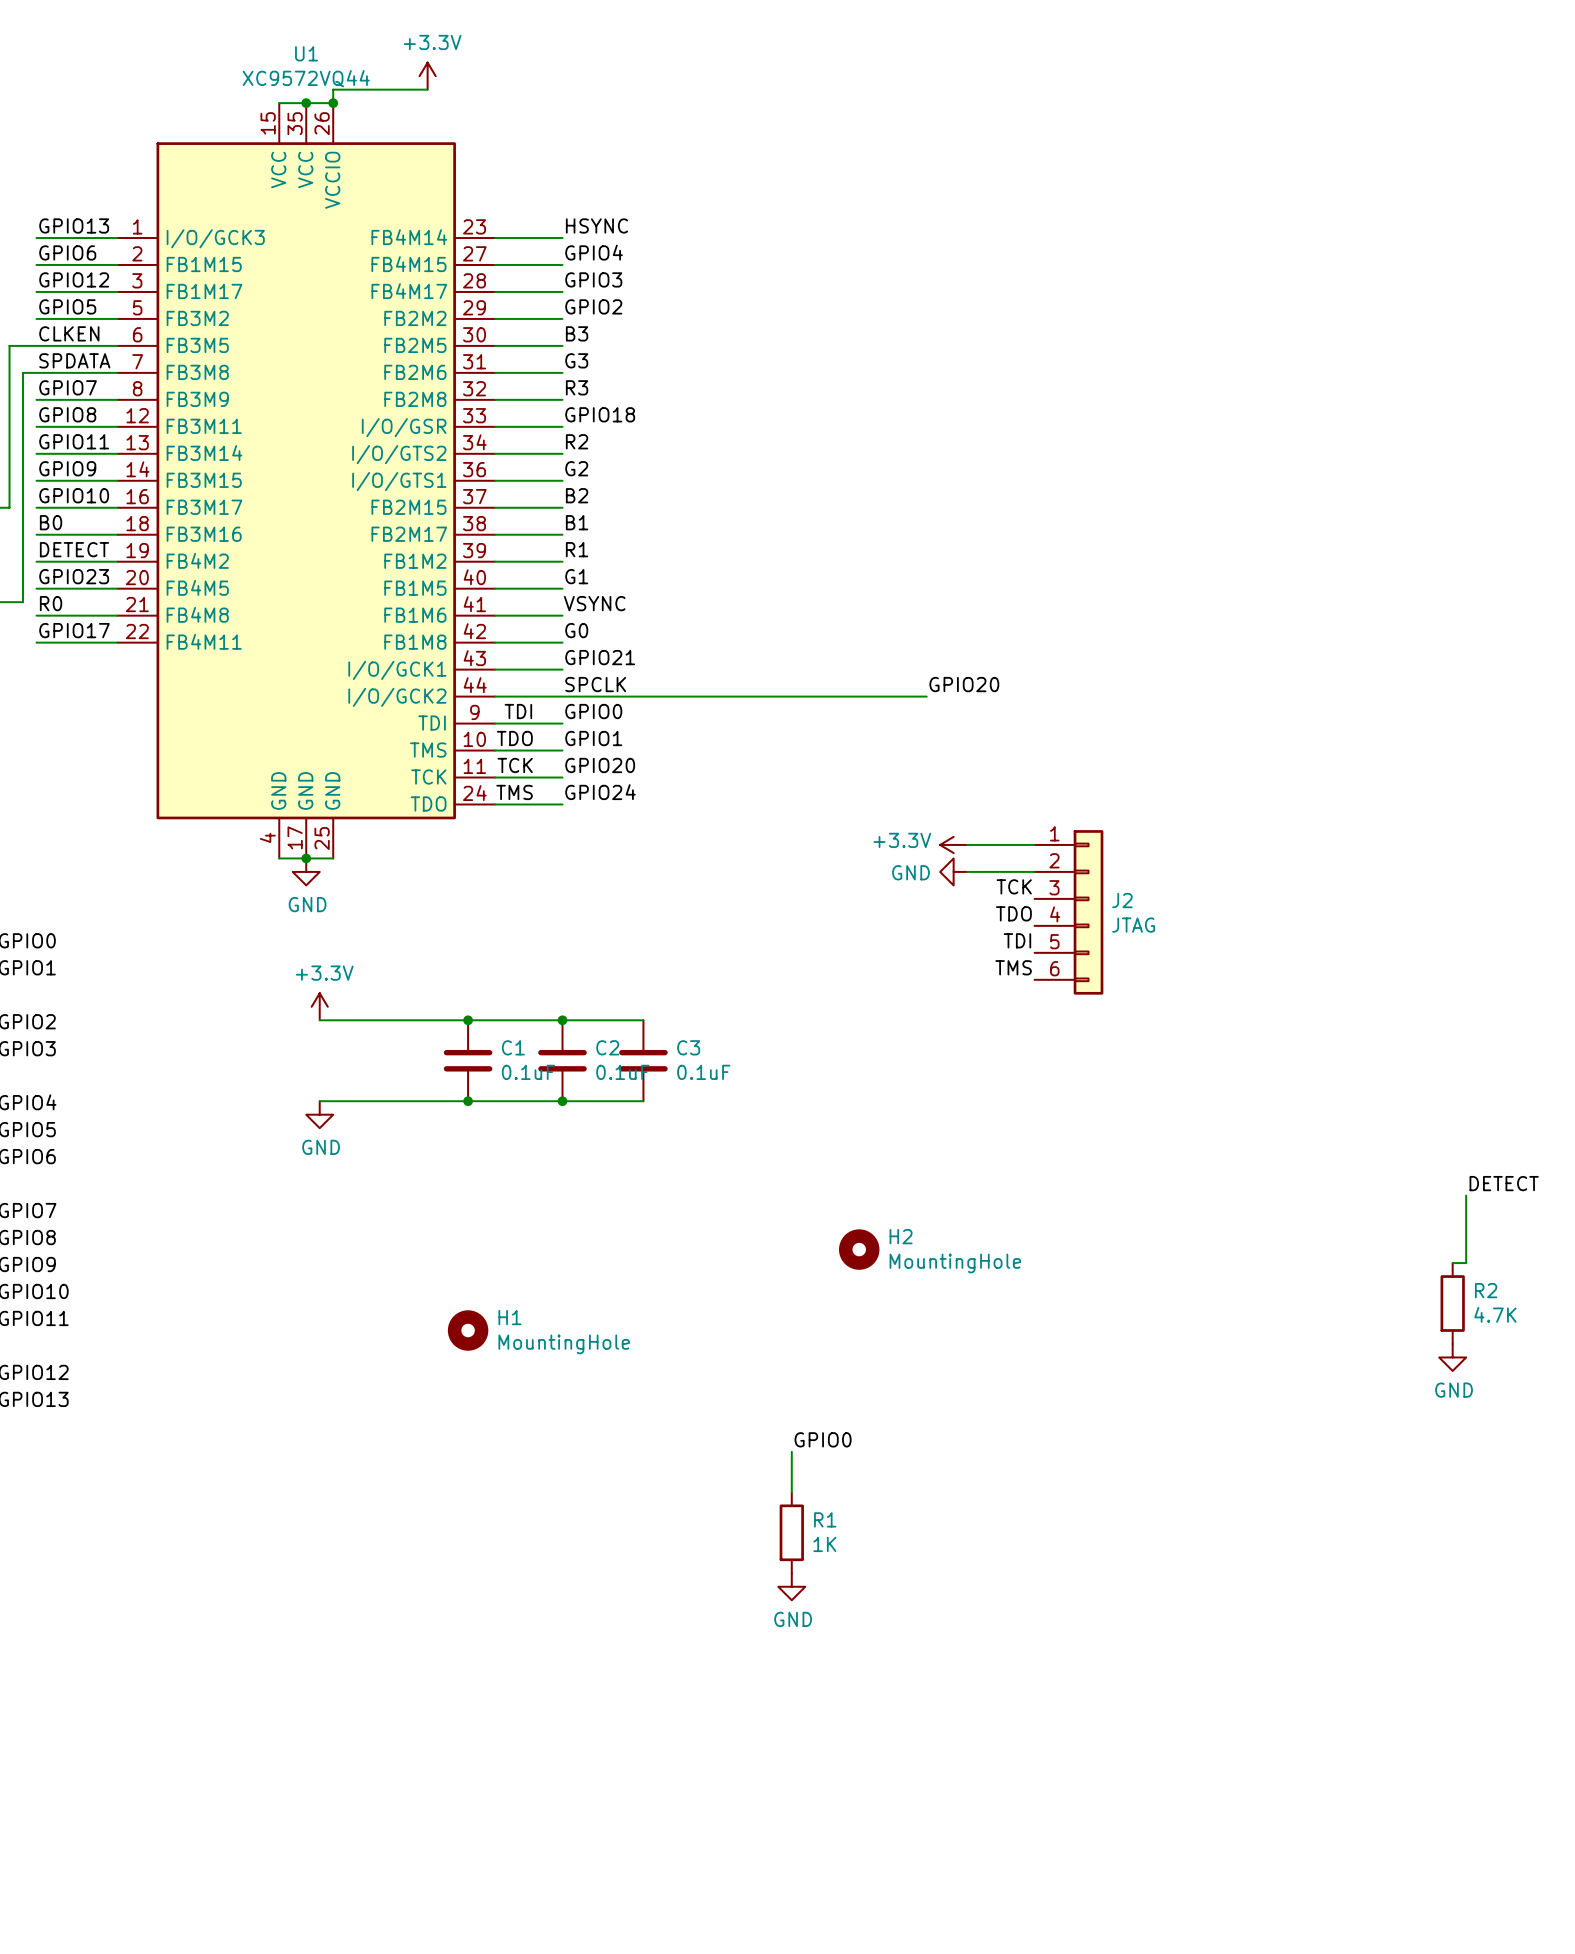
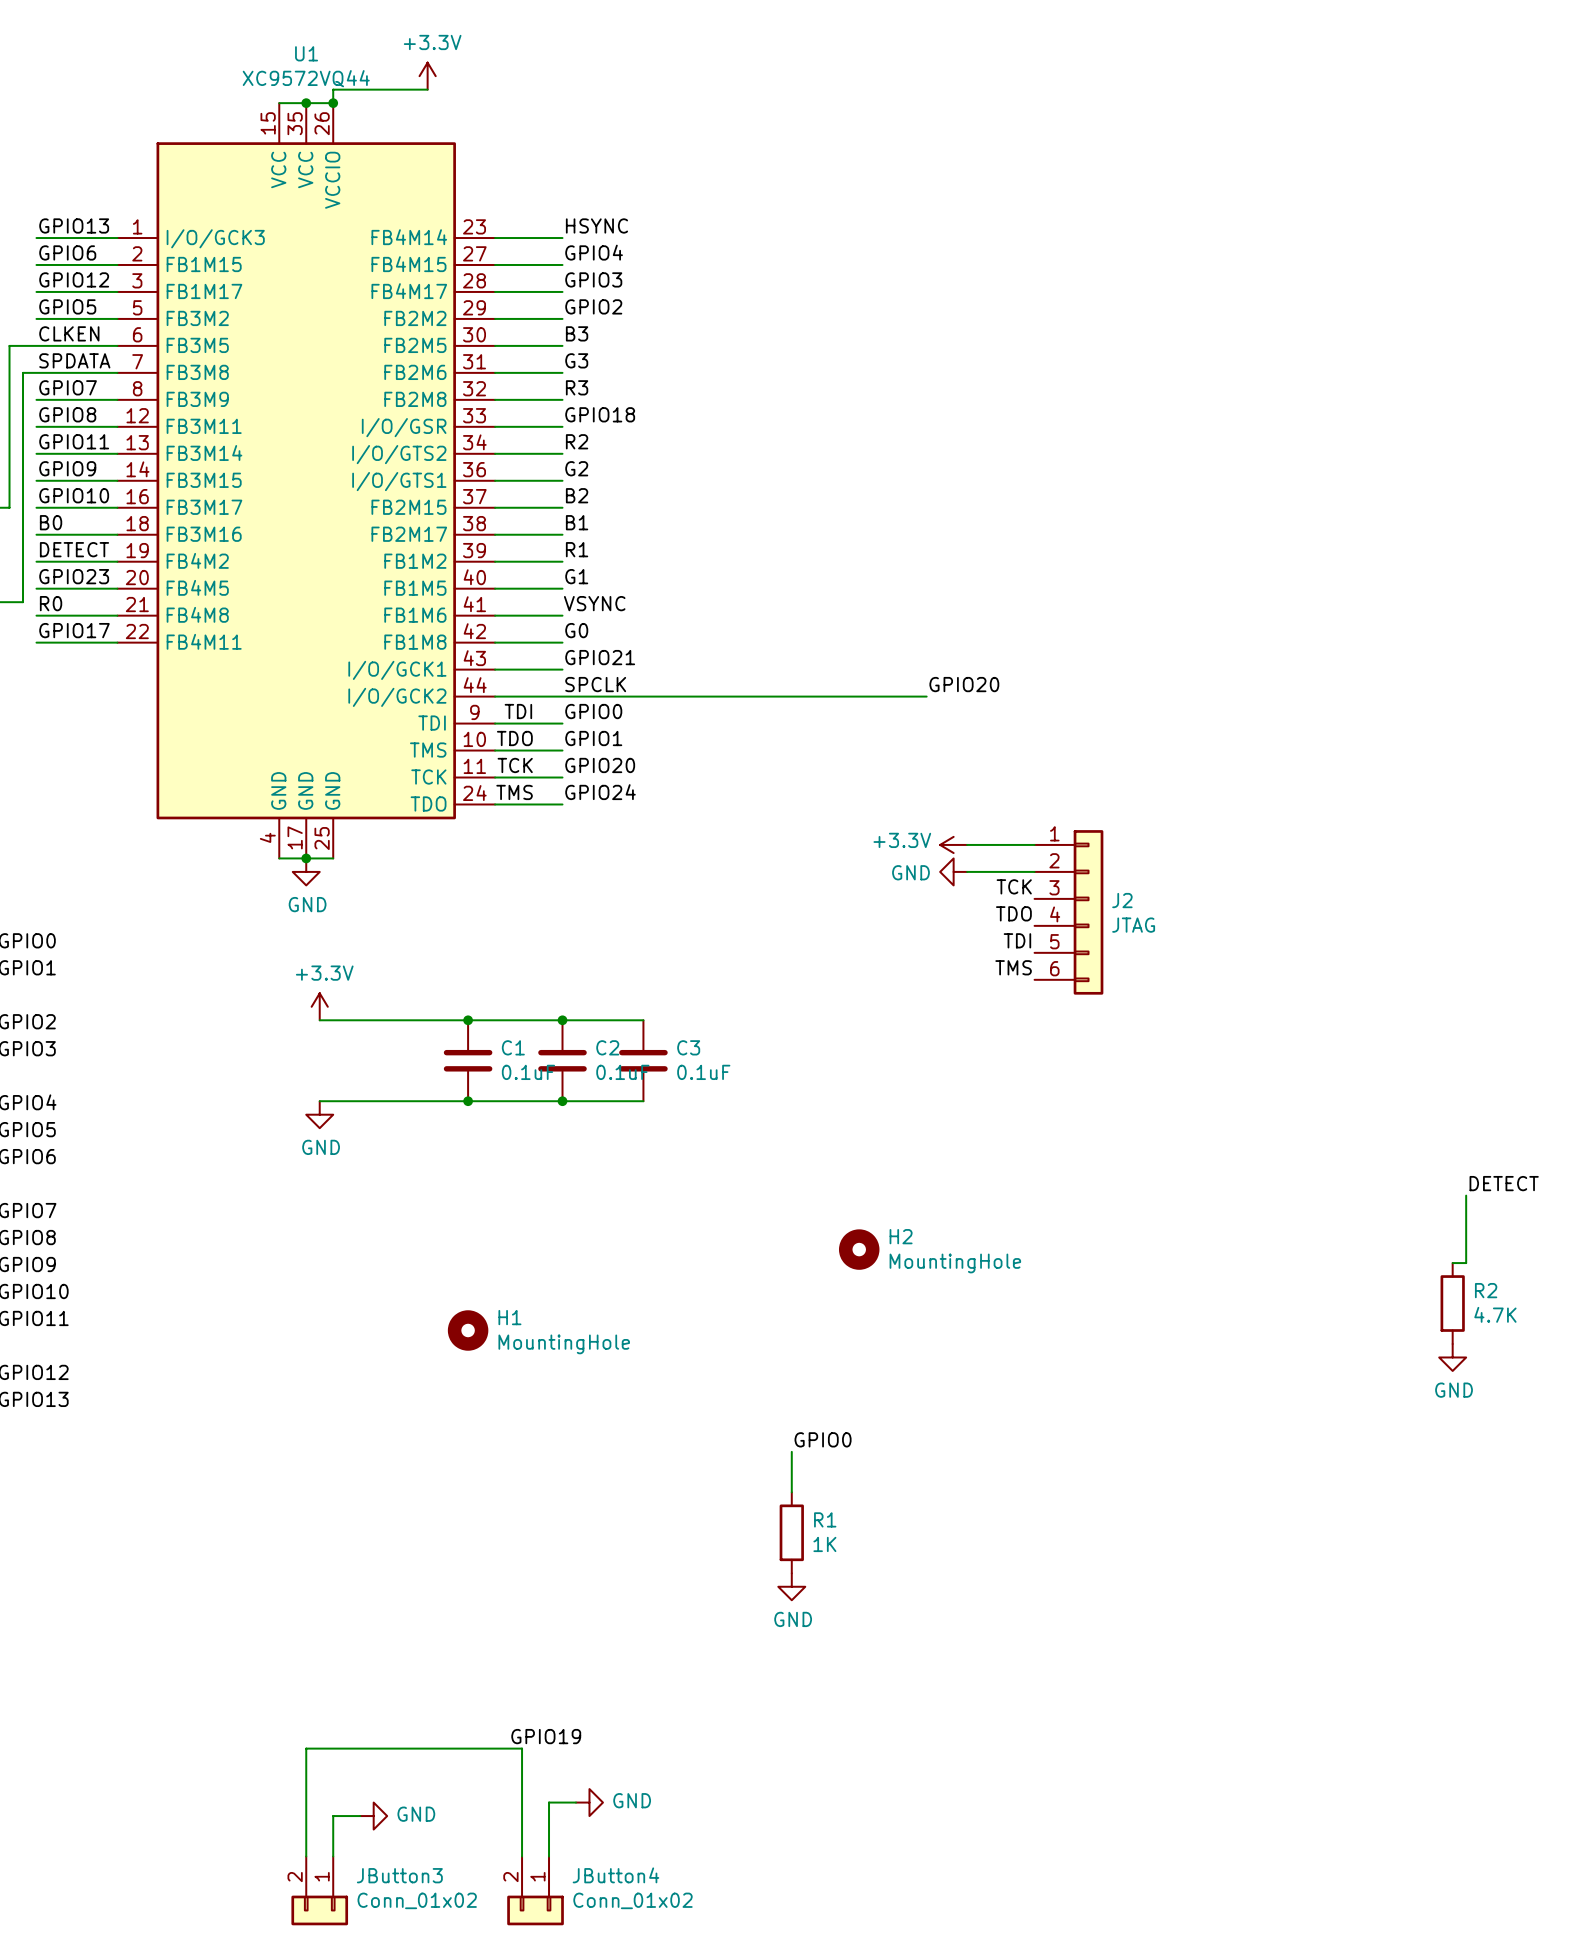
label: none -> GPIO19 (546, 1736)
wire: none -> (575, 1802) (549, 1802) (549, 1856)
power symbol: none -> GND (589, 1802)
wire: none -> (360, 1816) (333, 1816) (333, 1856)
power symbol: none -> GND (373, 1816)
wire: none -> (306, 1856) (306, 1748) (522, 1748) (522, 1856)
JButton3: none -> Conn_01x02 (319, 1890)
JButton4: none -> Conn_01x02 (535, 1890)

